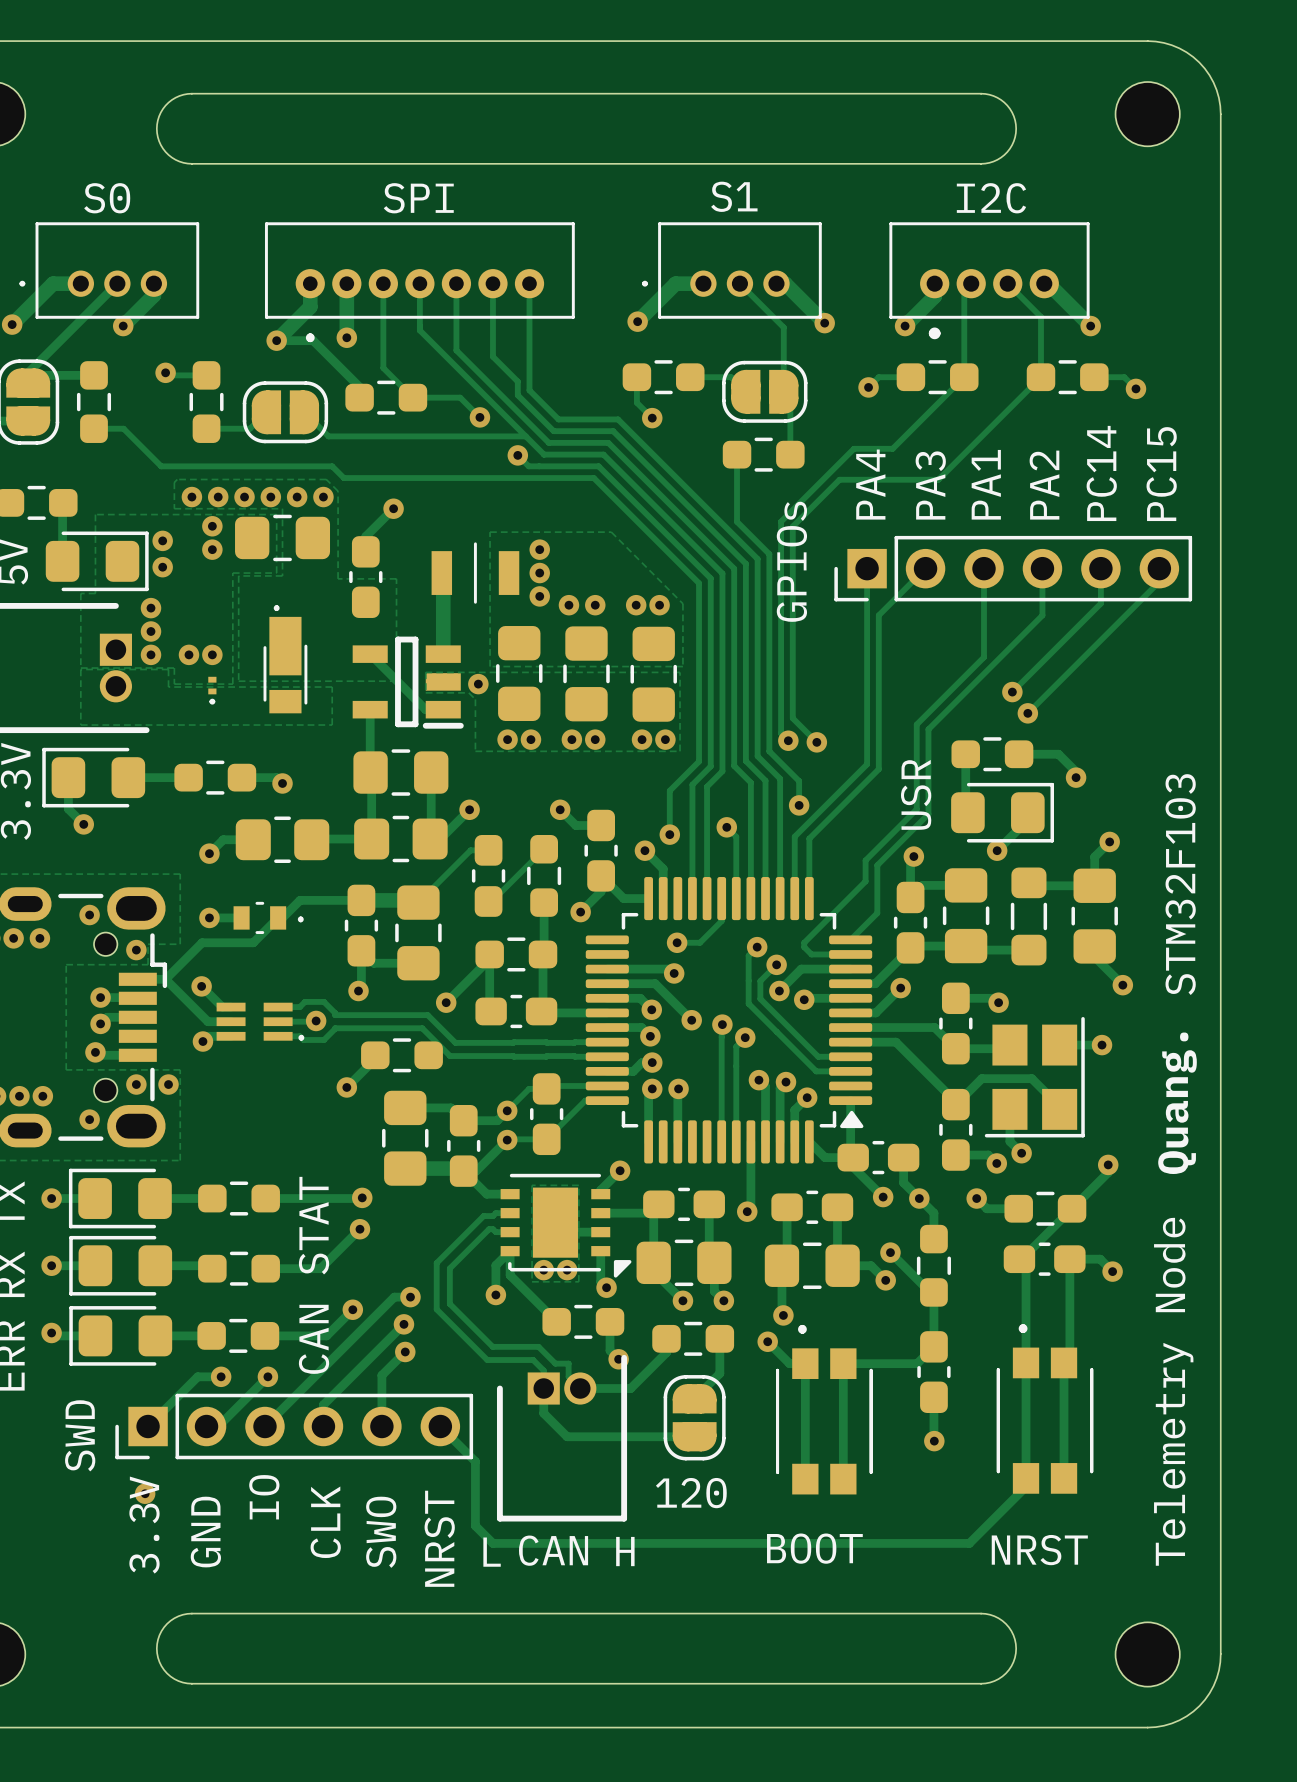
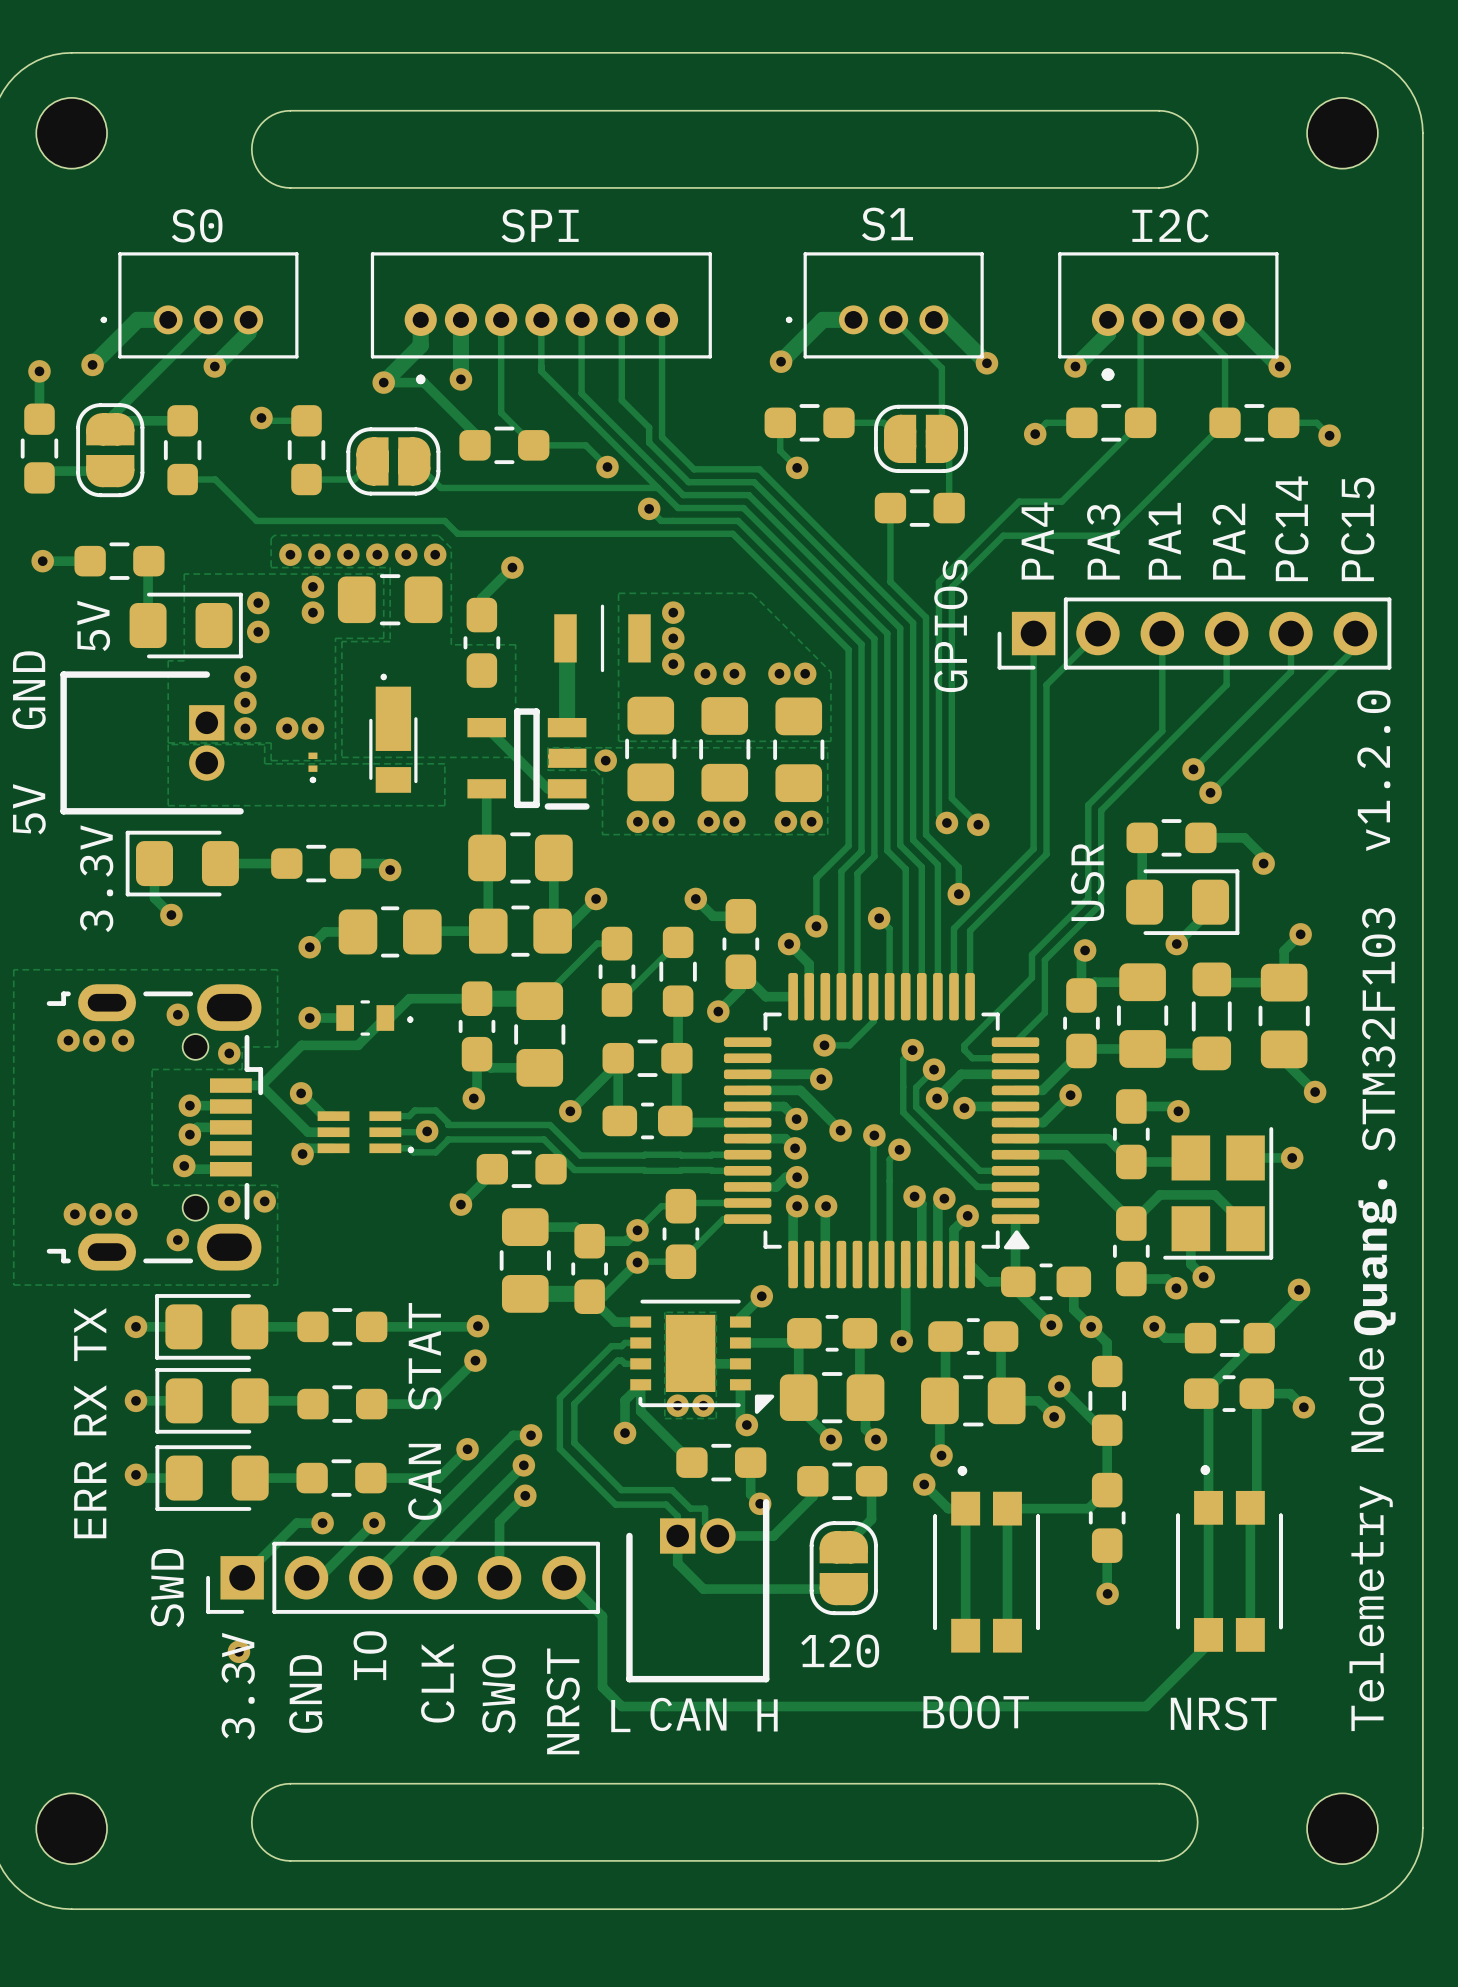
text: none -> v1.2.0 (1373, 770)
text position: STM32F103 (1180, 884) -> STM32F103 (1378, 1029)
text position: Quang. (1177, 1103) -> Quang. (1375, 1257)

